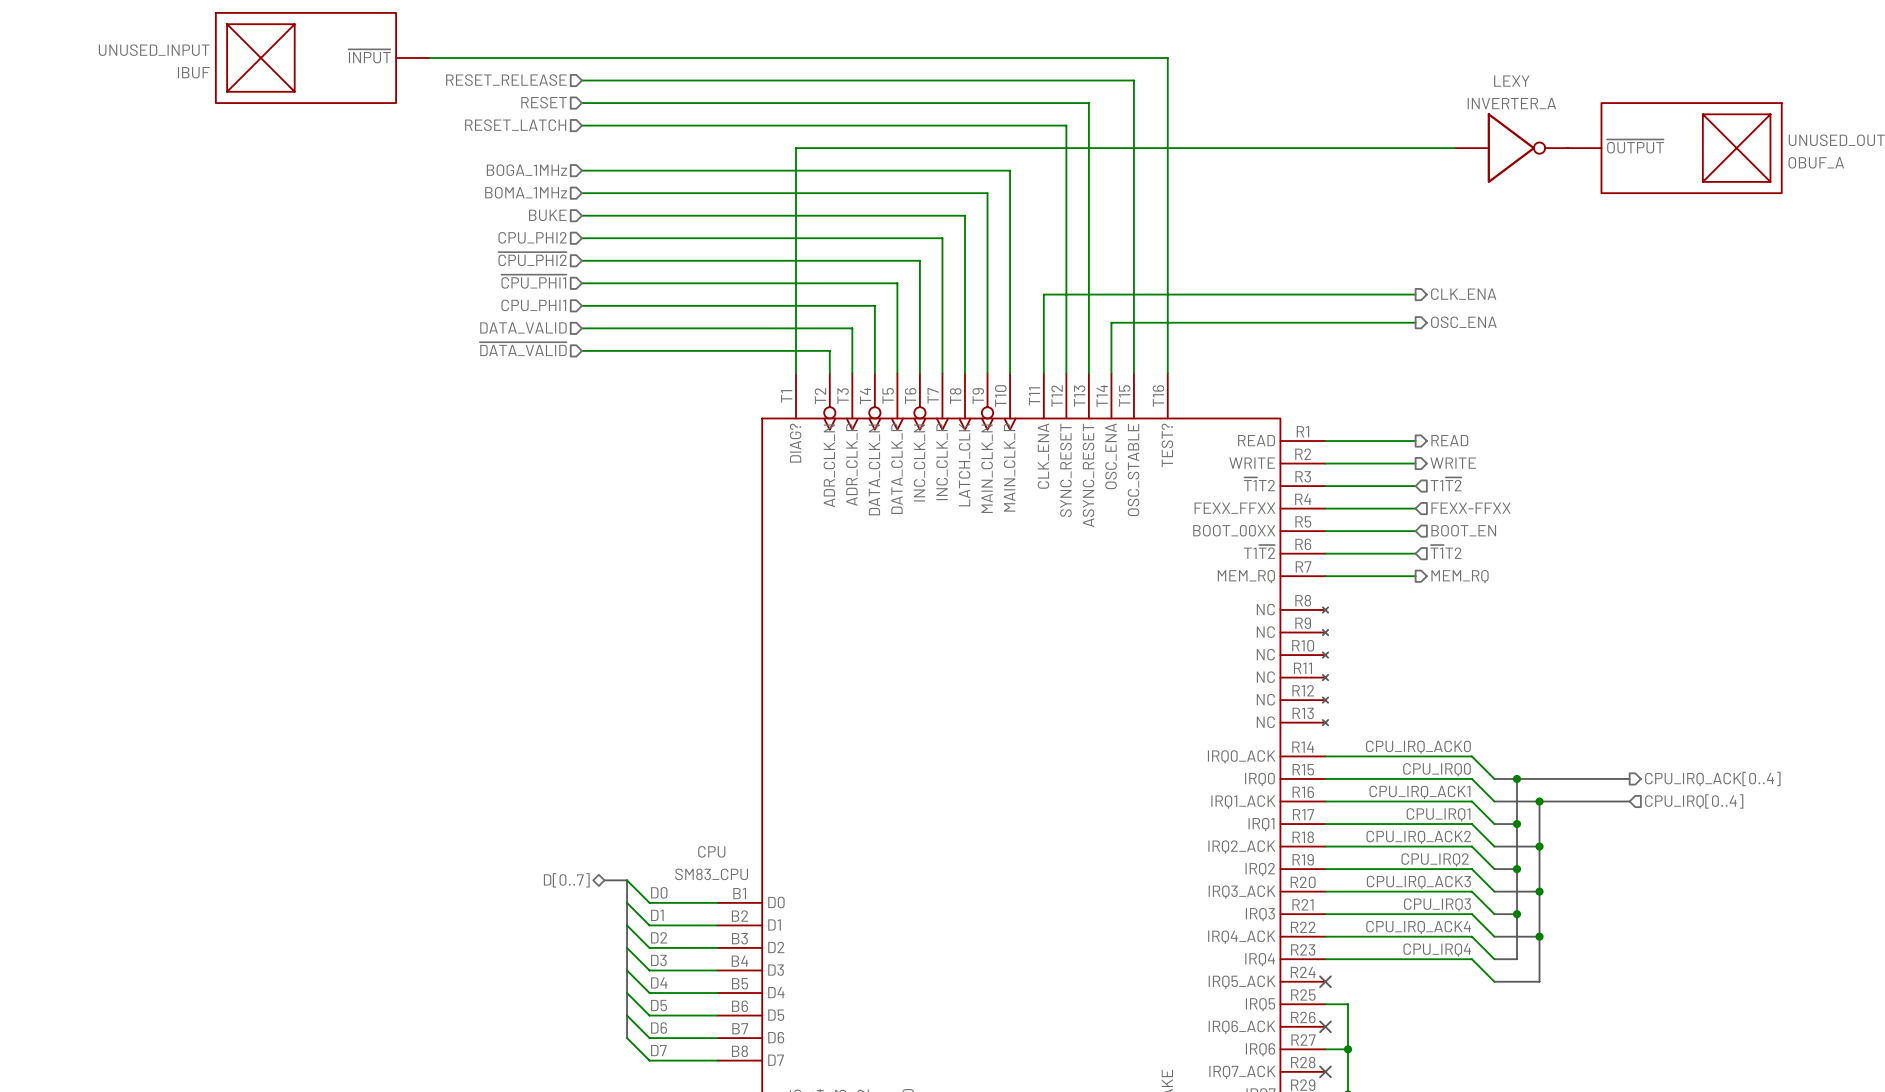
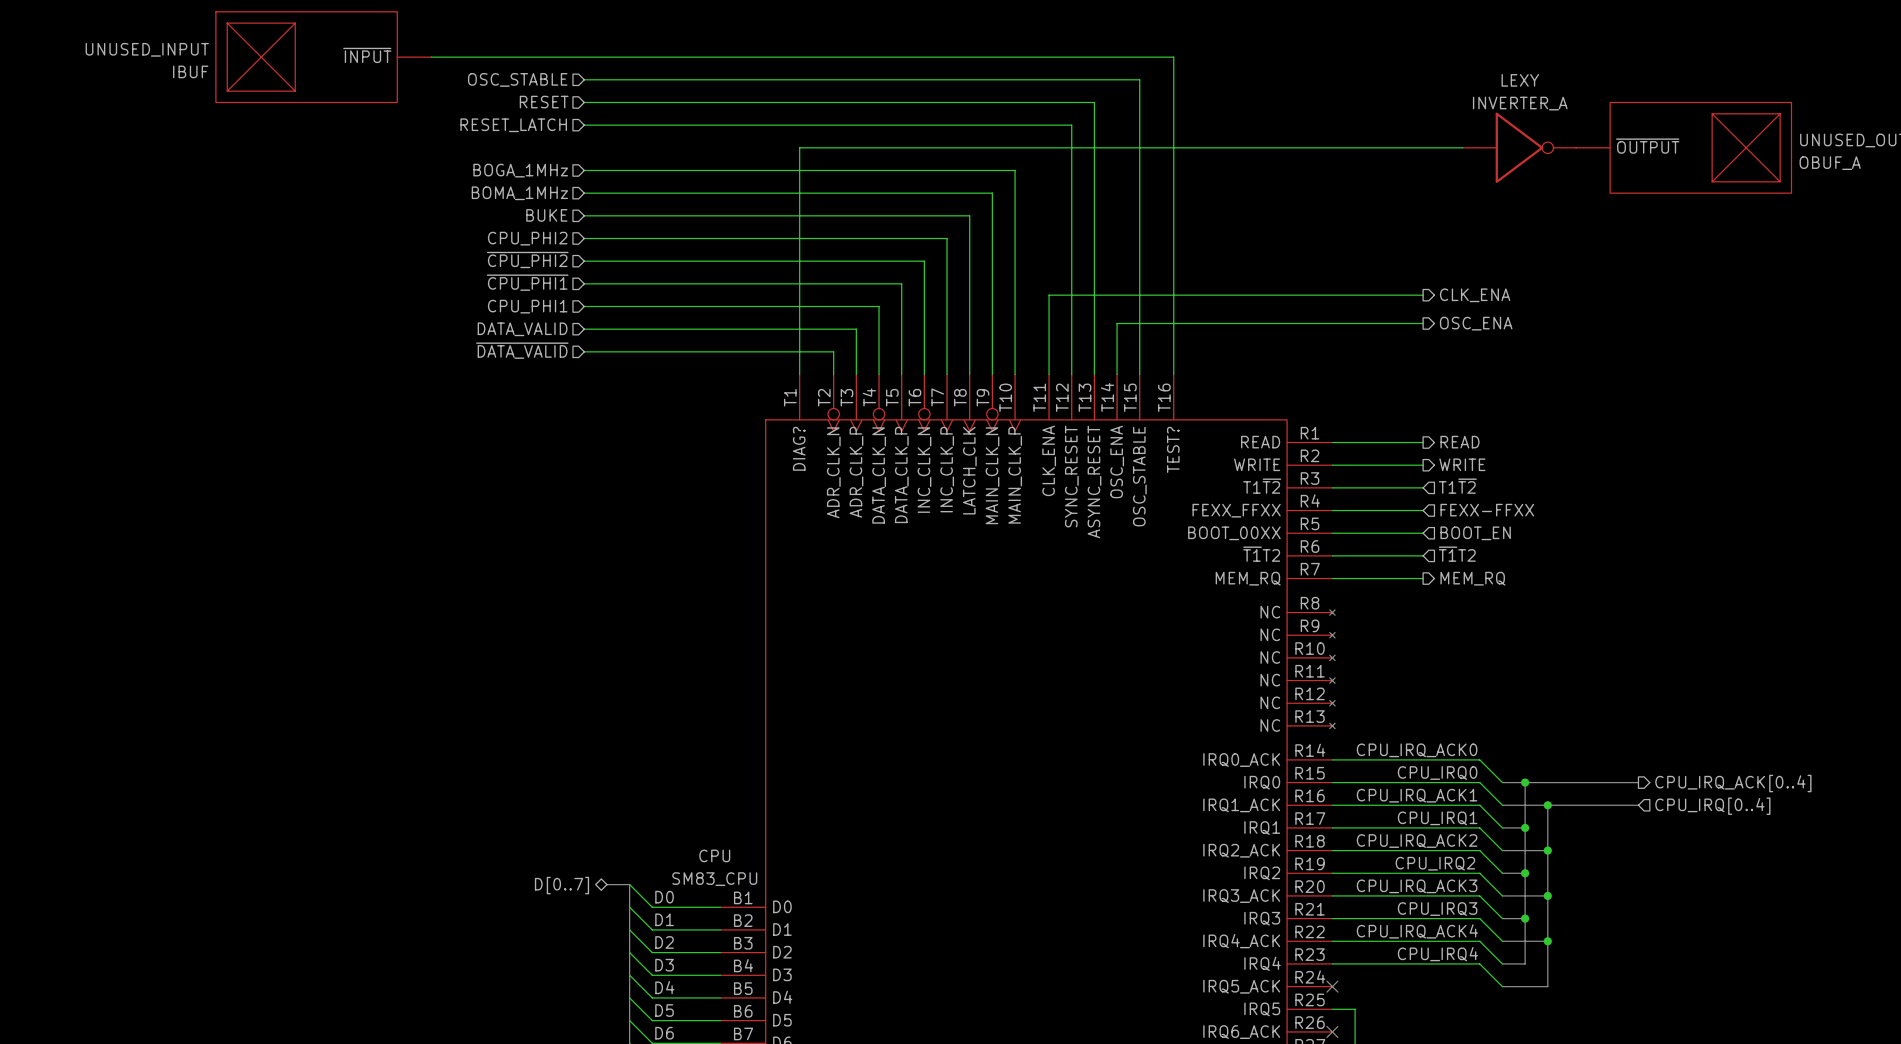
hierarchical label: RESET_RELEASE (506, 80) -> OSC_STABLE (517, 79)
CPU pin name: ~{T1}T2 (1259, 484) -> T1~{T2} (1262, 486)
CPU pin name: T1~{T2} (1259, 551) -> ~{T1}T2 (1261, 554)

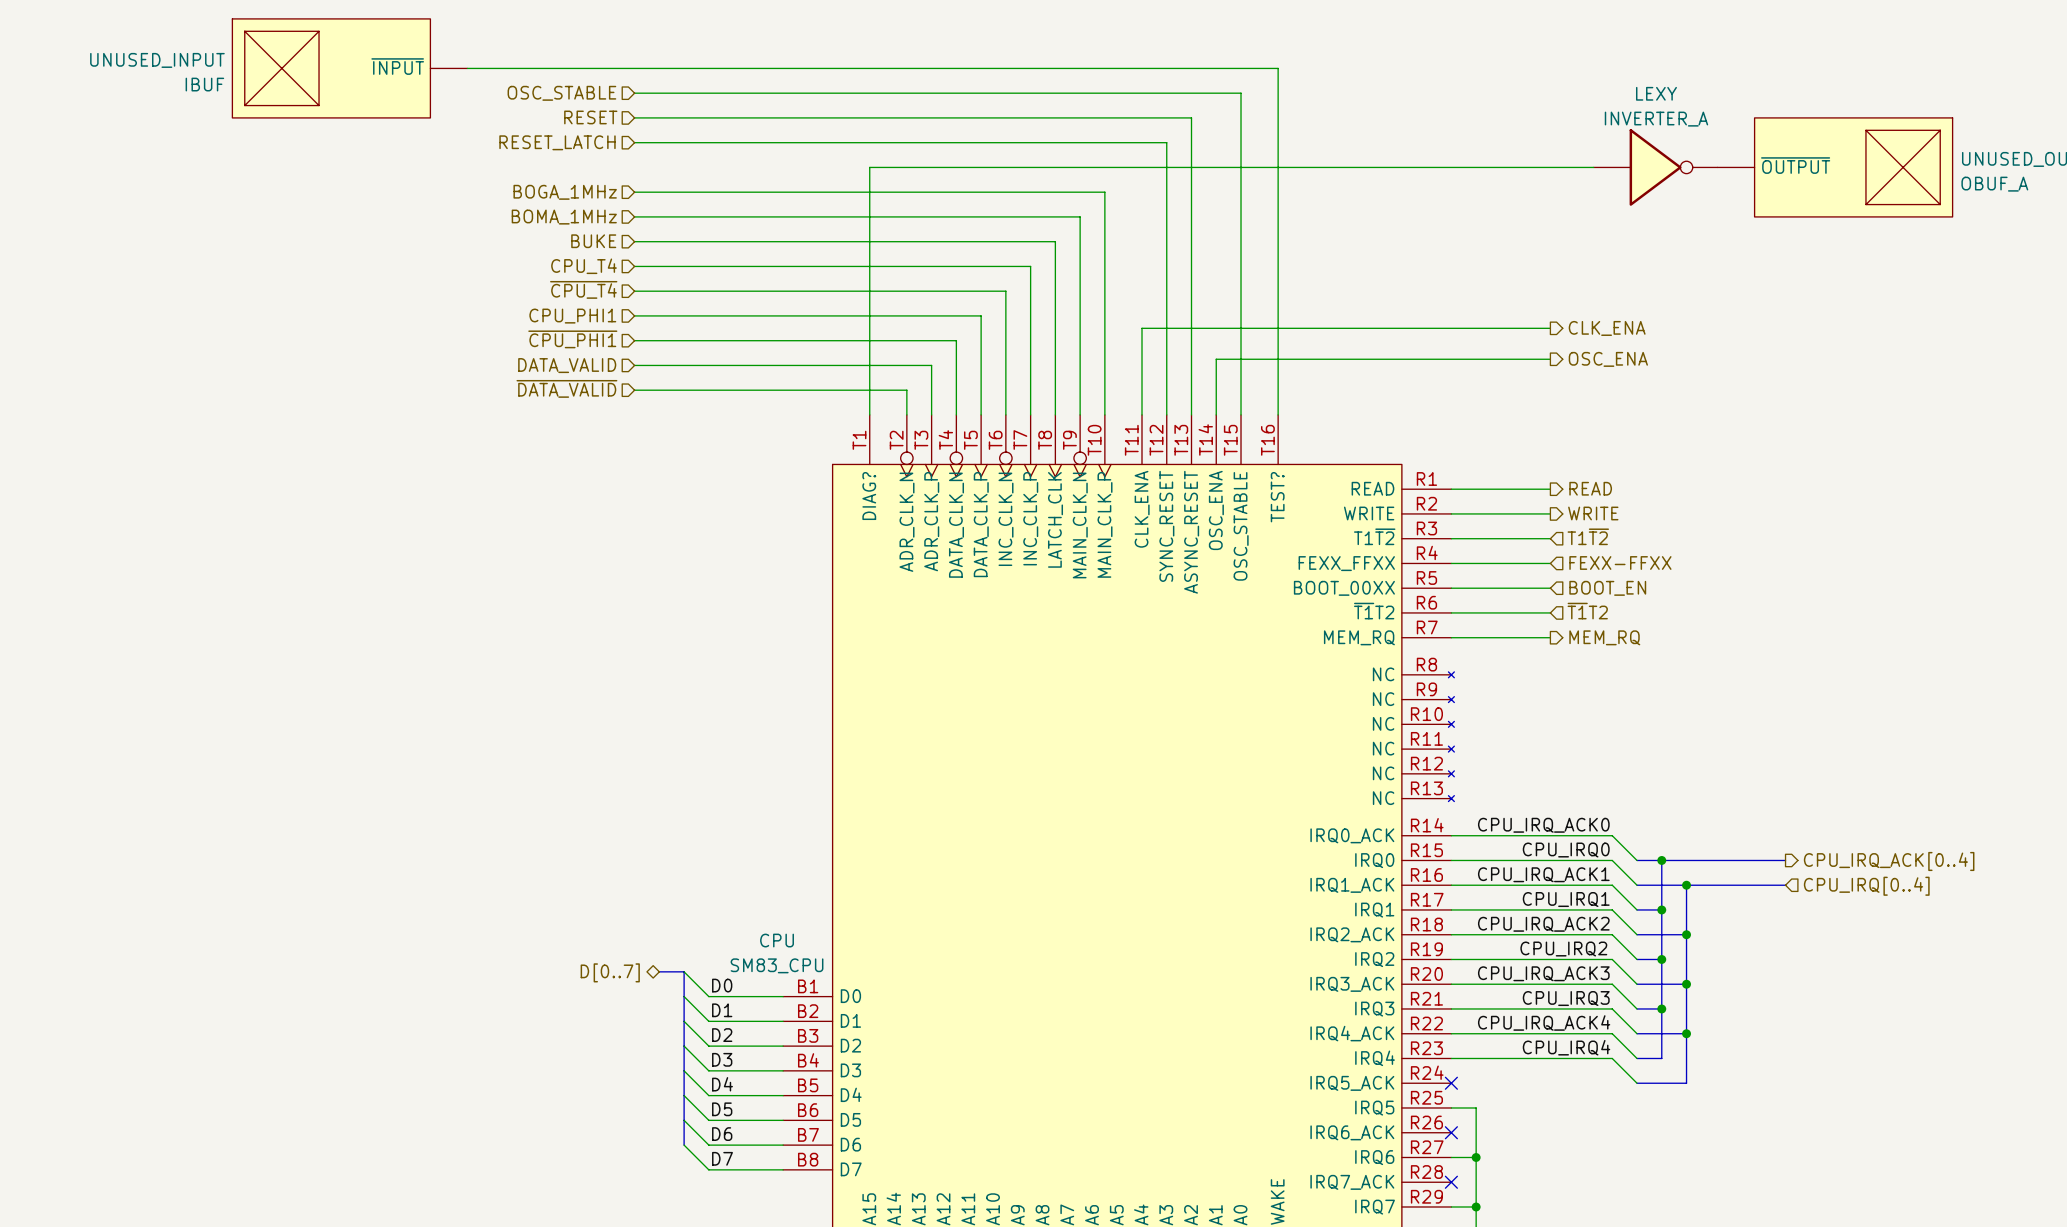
hierarchical label: CPU_PHI2 (527, 238) -> CPU_T4 (584, 266)
hierarchical label: ~{CPU_PHI2} (527, 259) -> ~{CPU_T4} (583, 289)
hierarchical label: ~{CPU_PHI1} (527, 282) -> CPU_PHI1 (572, 316)
hierarchical label: CPU_PHI1 (527, 306) -> ~{CPU_PHI1} (572, 339)

